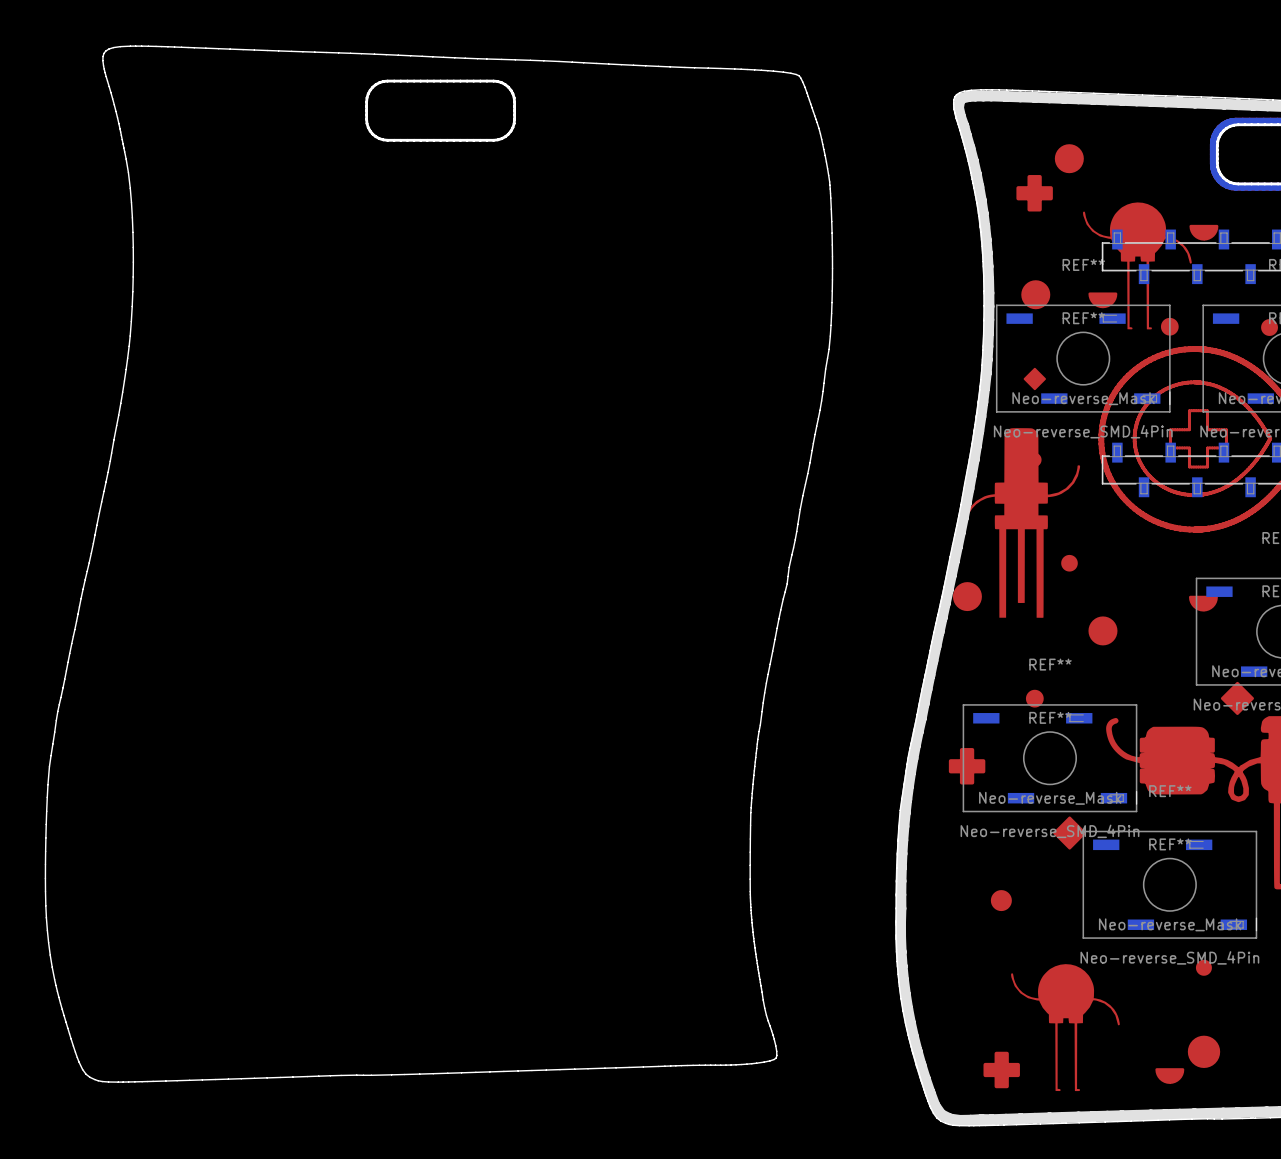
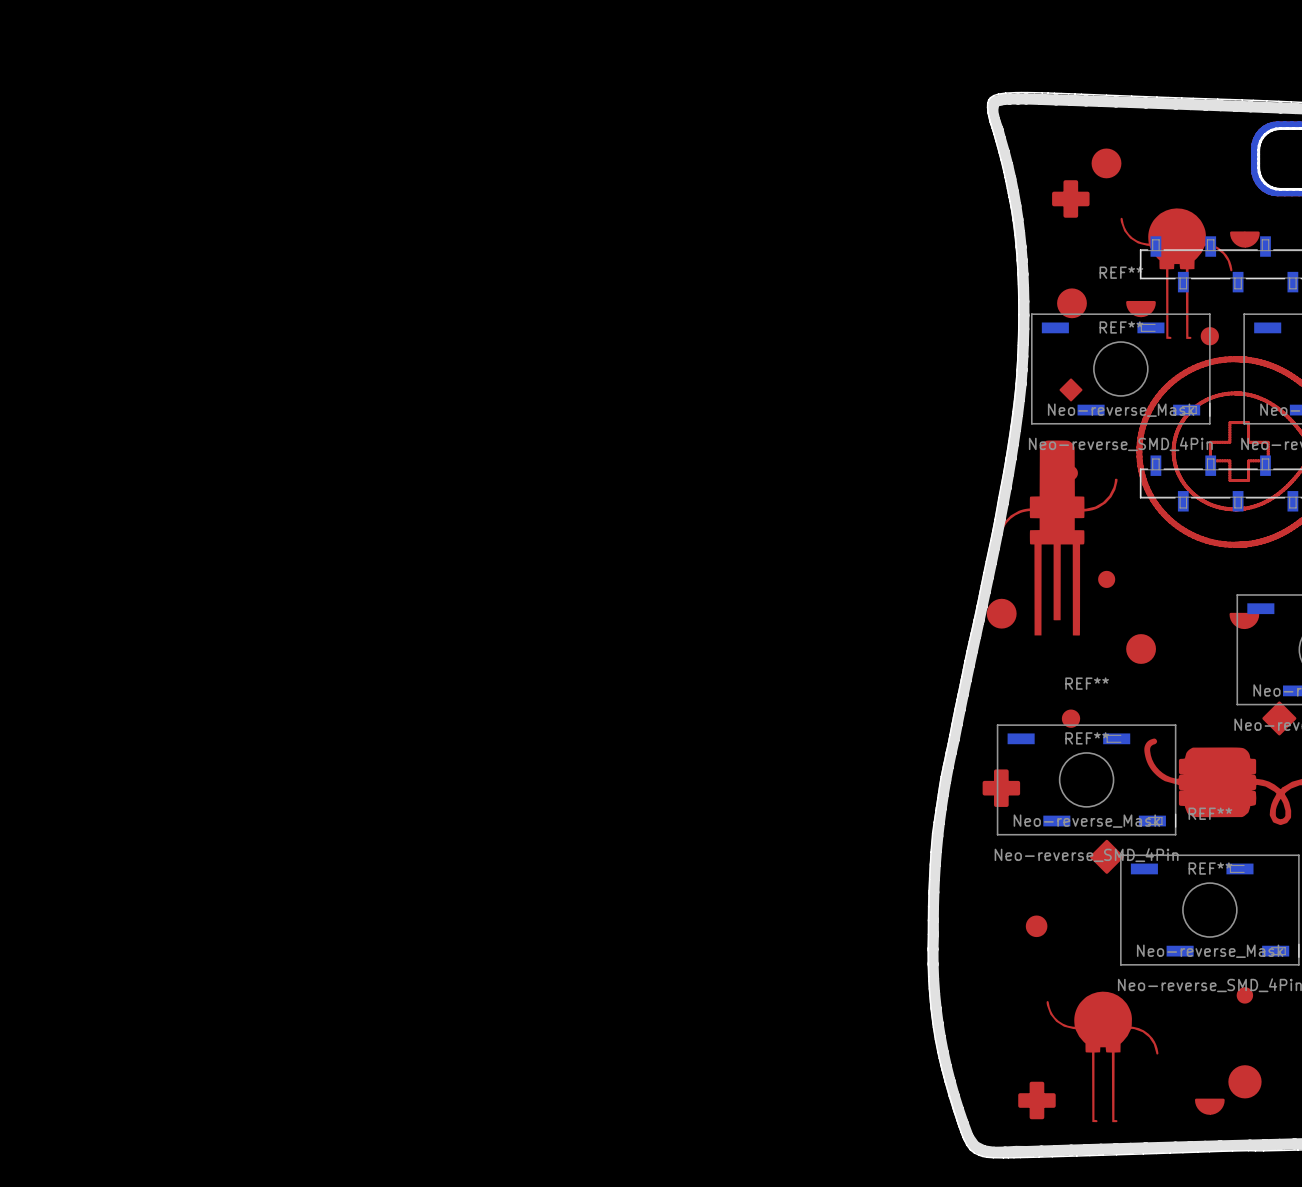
drawing: [44, 45, 834, 1083] -> none

